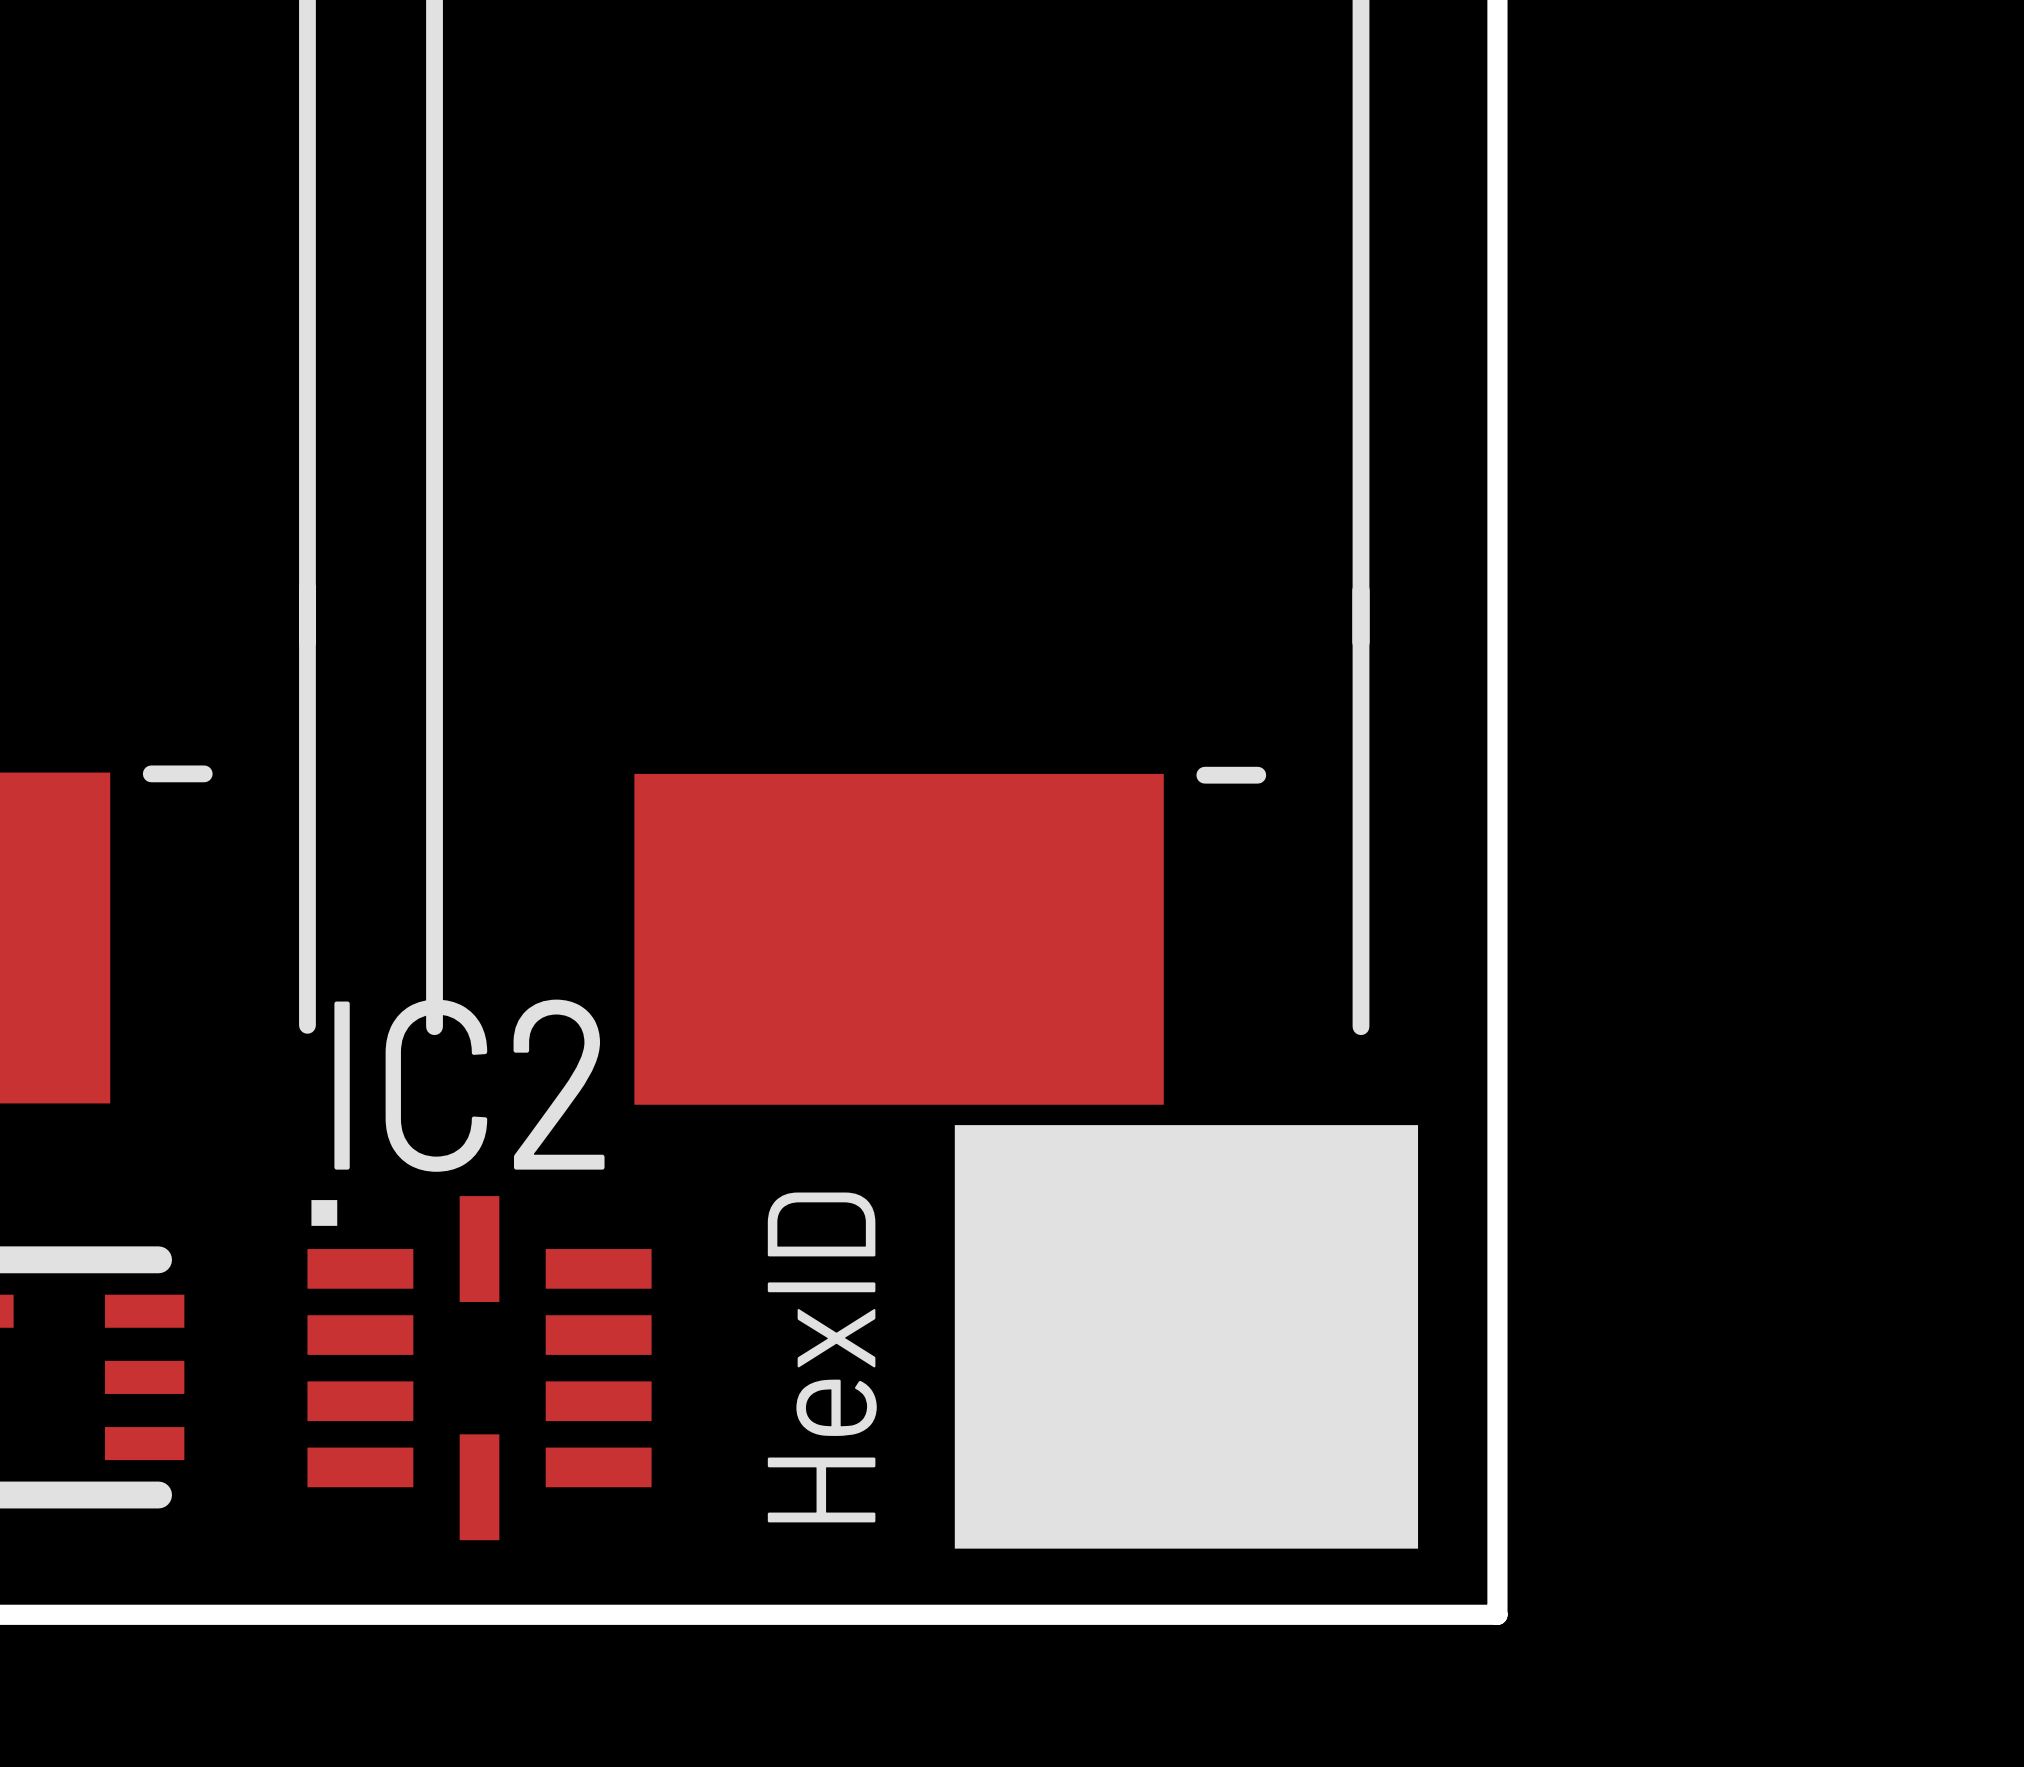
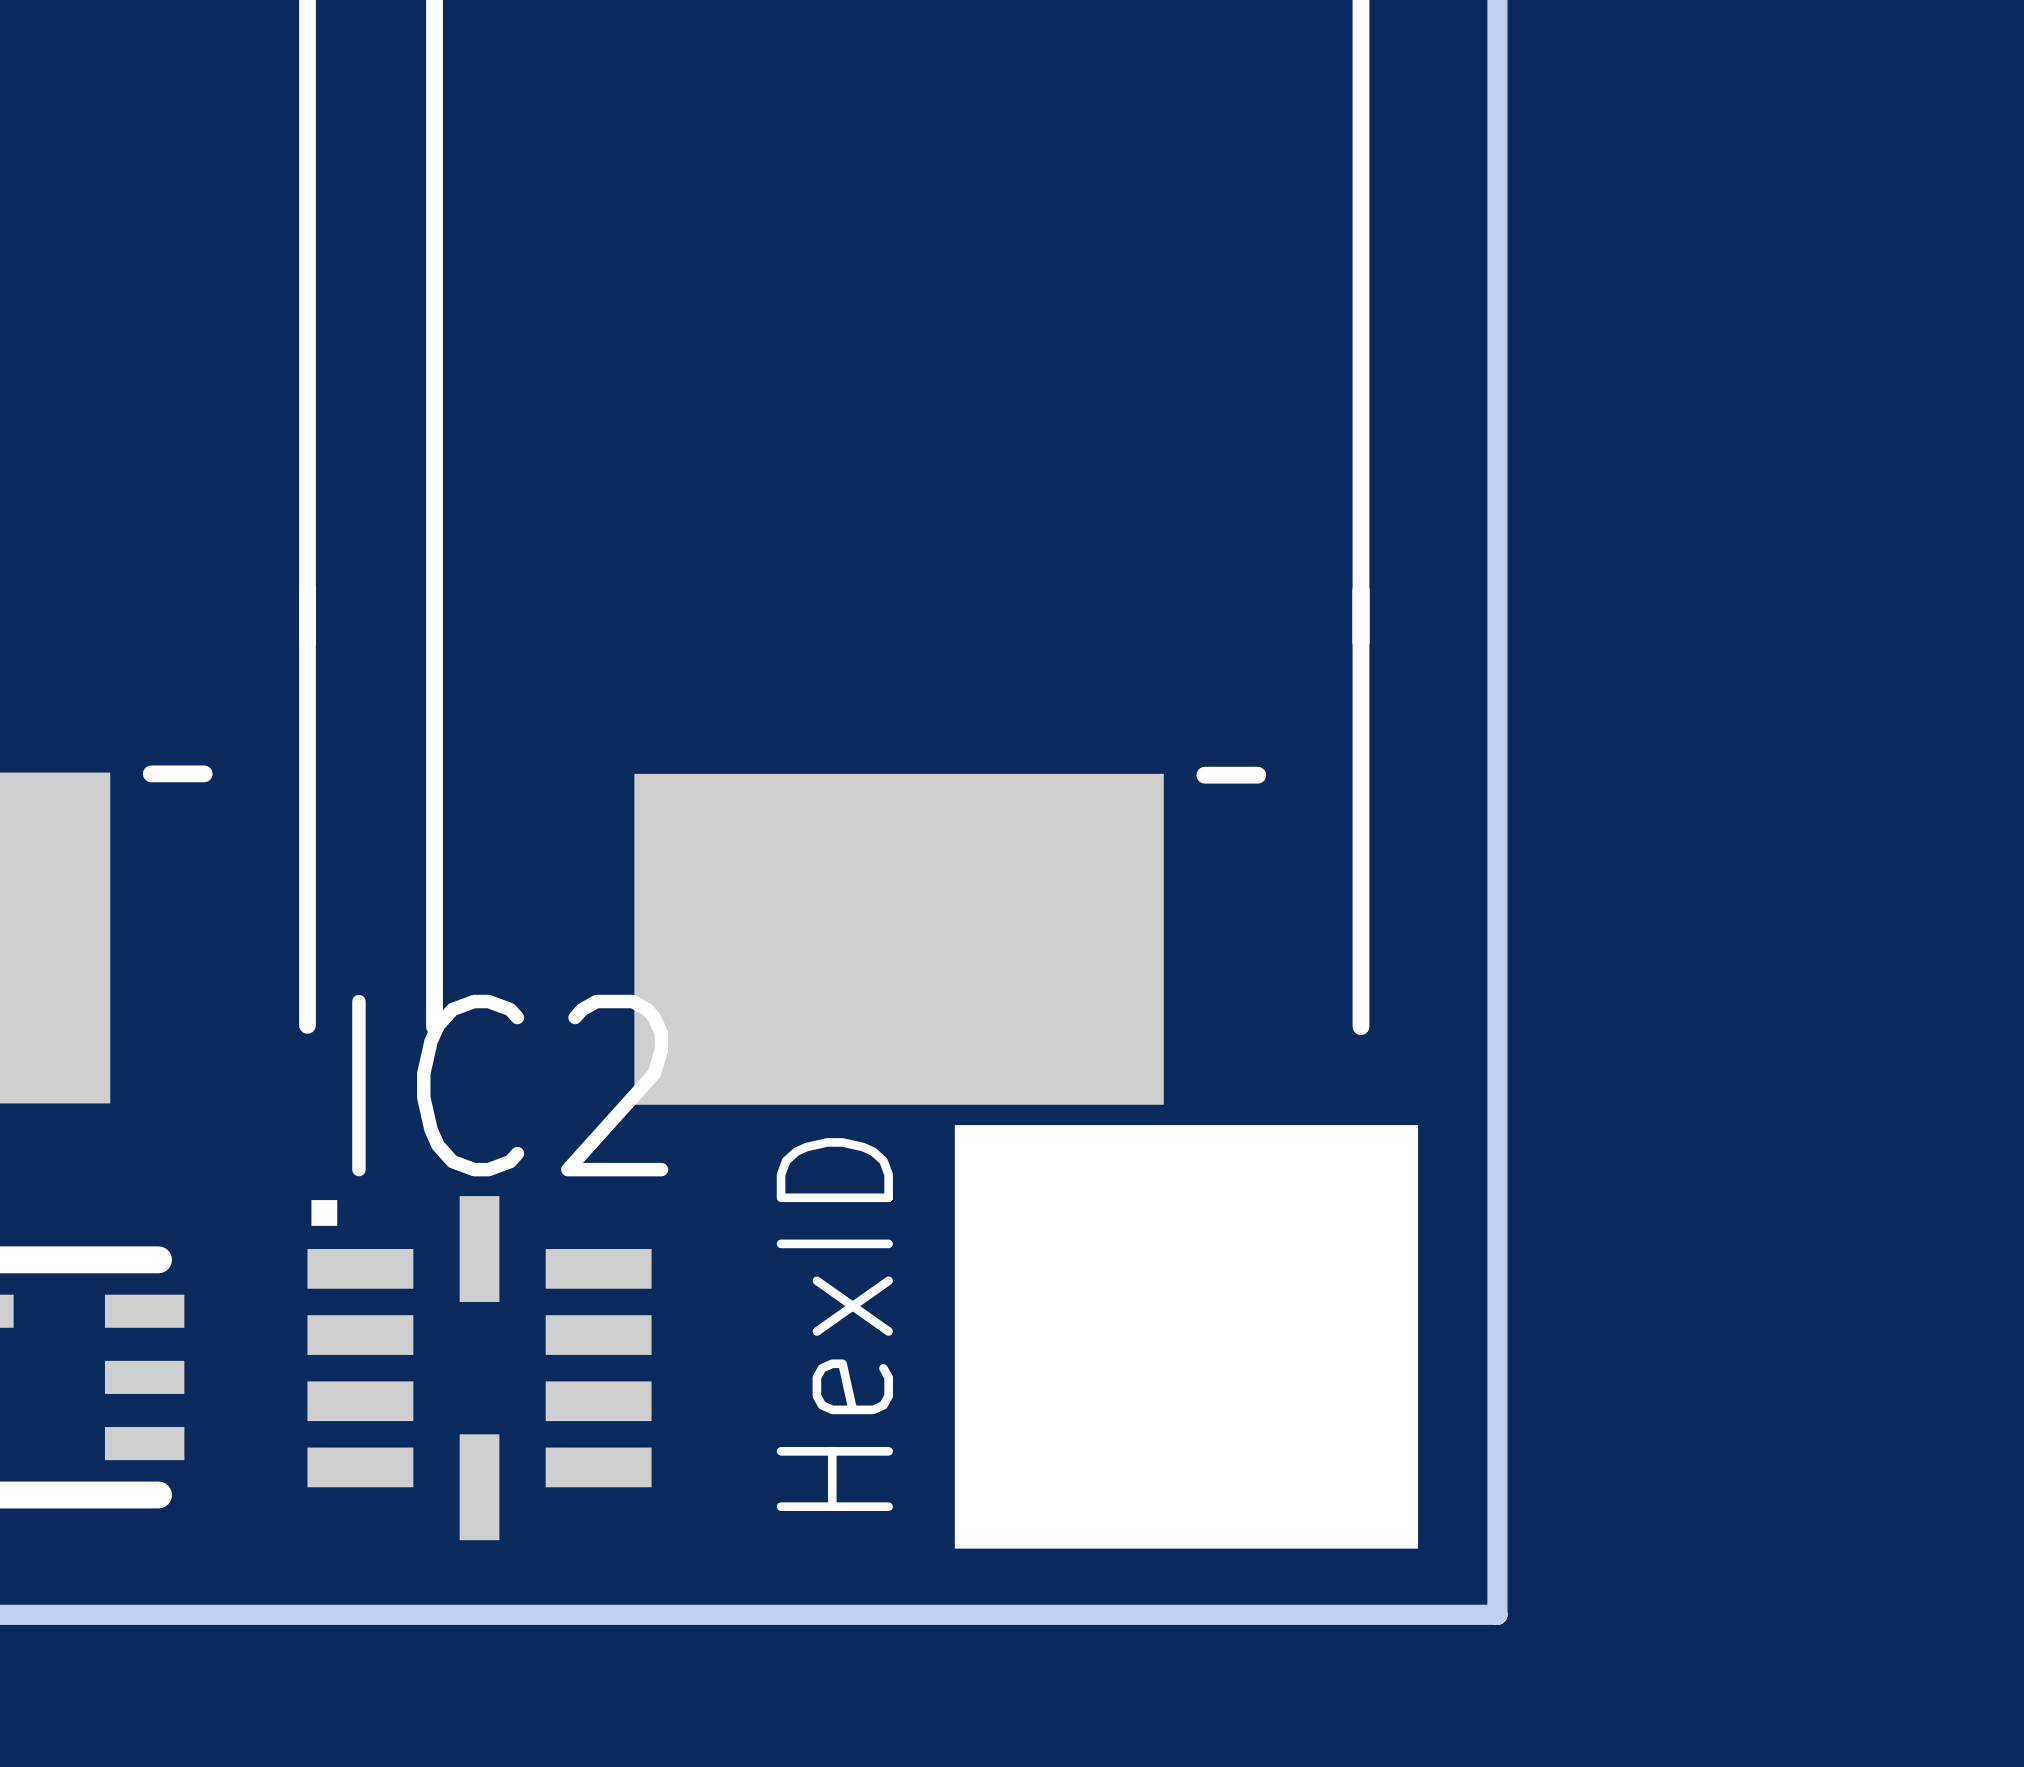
text position: HexID (822, 1357) -> HexID (834, 1324)

